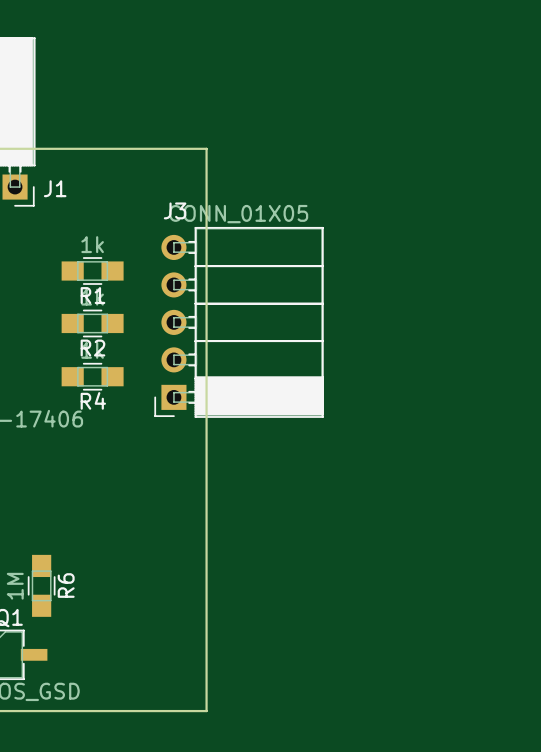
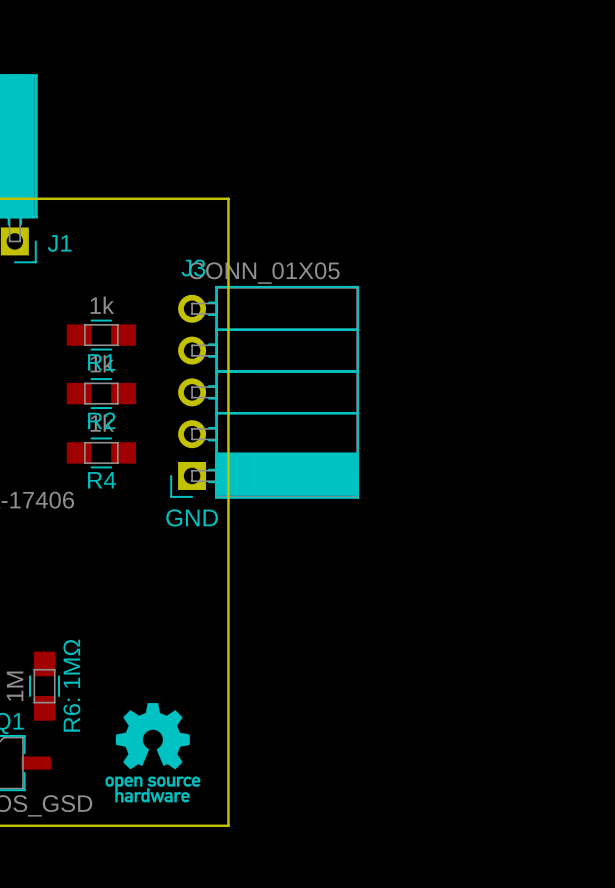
text: none -> GND (192, 517)
R6 name: R6 (66, 585) -> R6: 1MΩ (71, 685)
drawing: none -> [105, 702, 201, 803]

